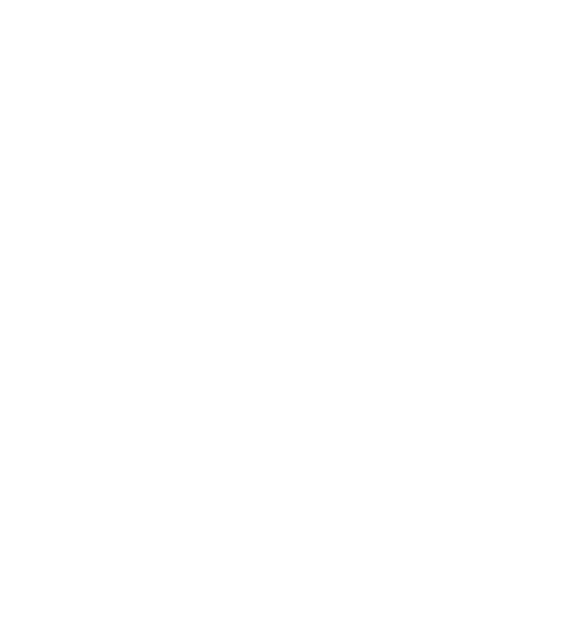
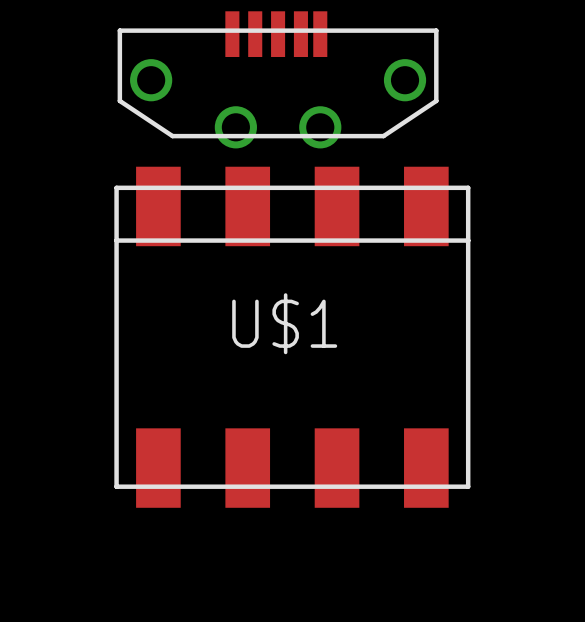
part: none -> (278, 79)
U$1: none -> (292, 337)

